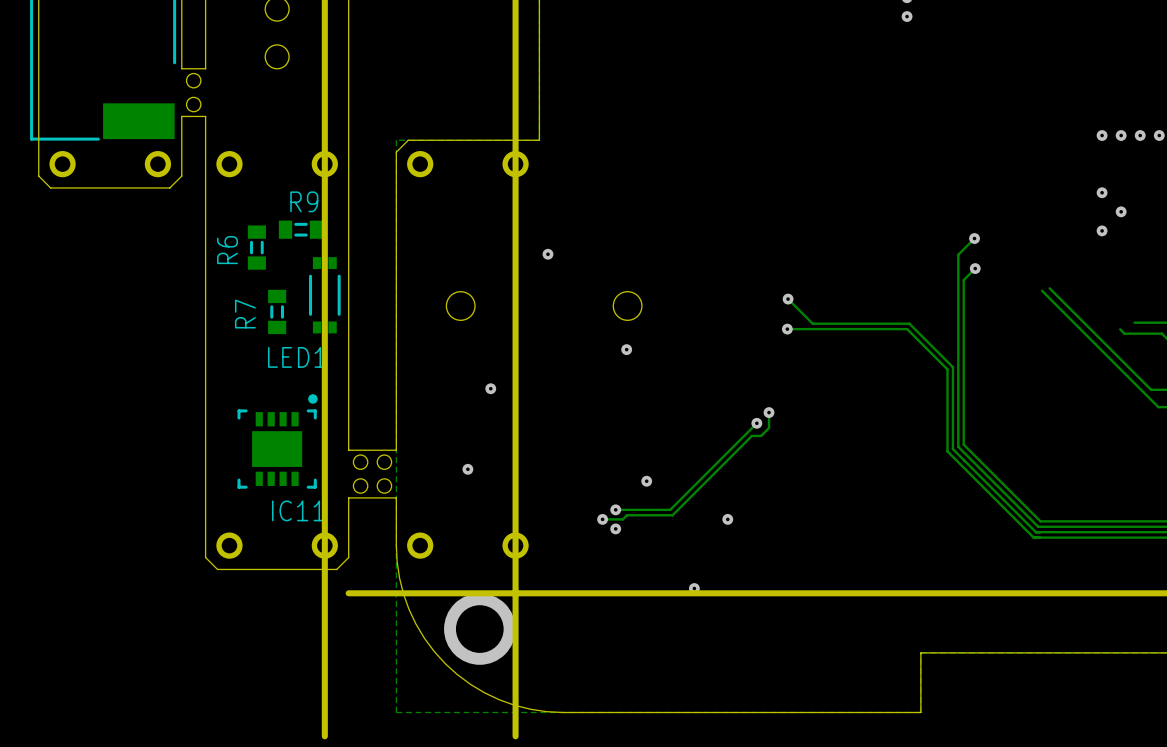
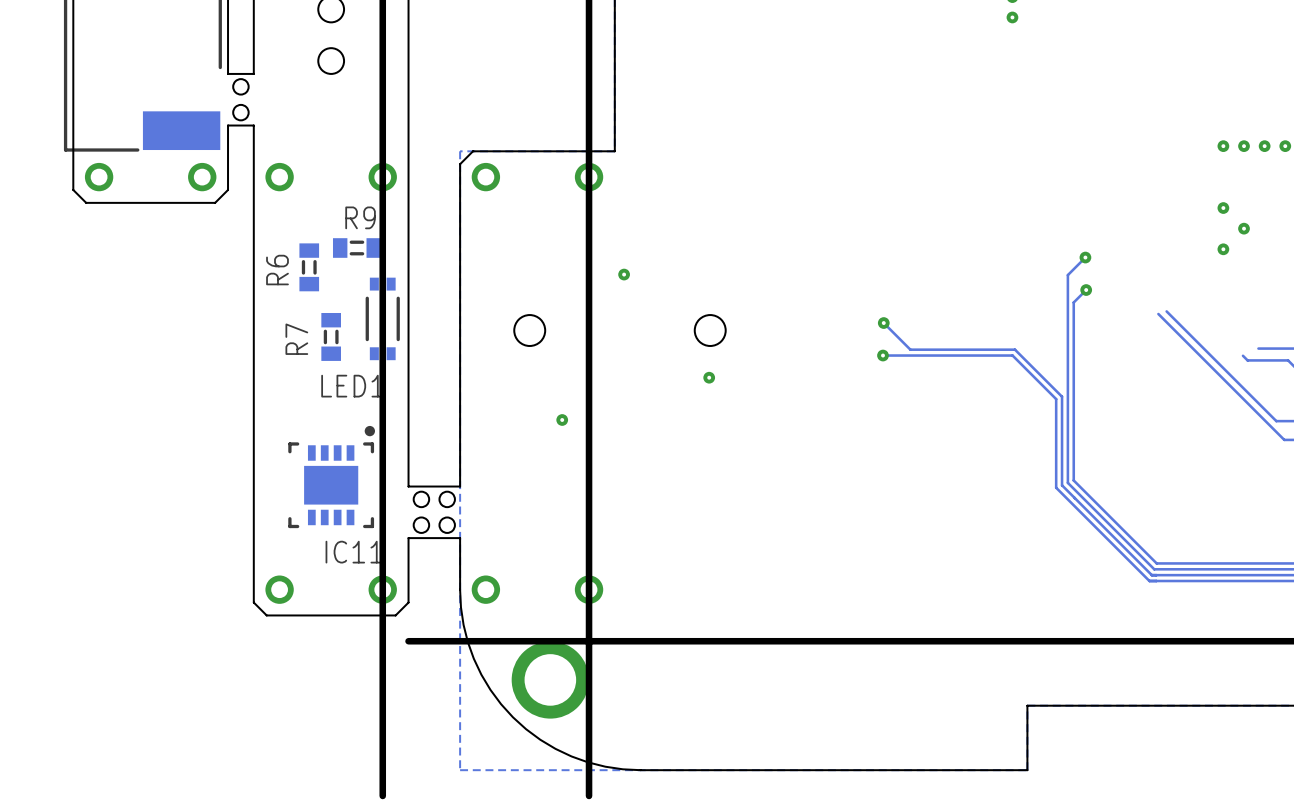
track: (769, 412) (769, 428) (761, 435) (751, 435) (672, 515) (626, 515) (622, 519) (602, 519) -> none
via: (769, 412) -> none
track: (756, 423) (670, 509) (615, 509) -> none
via: (756, 423) -> none
via: (467, 469) -> none
via: (646, 481) -> none
via: (615, 509) -> none
via: (602, 519) -> none
via: (727, 519) -> none
via: (615, 528) -> none
via: (694, 588) -> none

